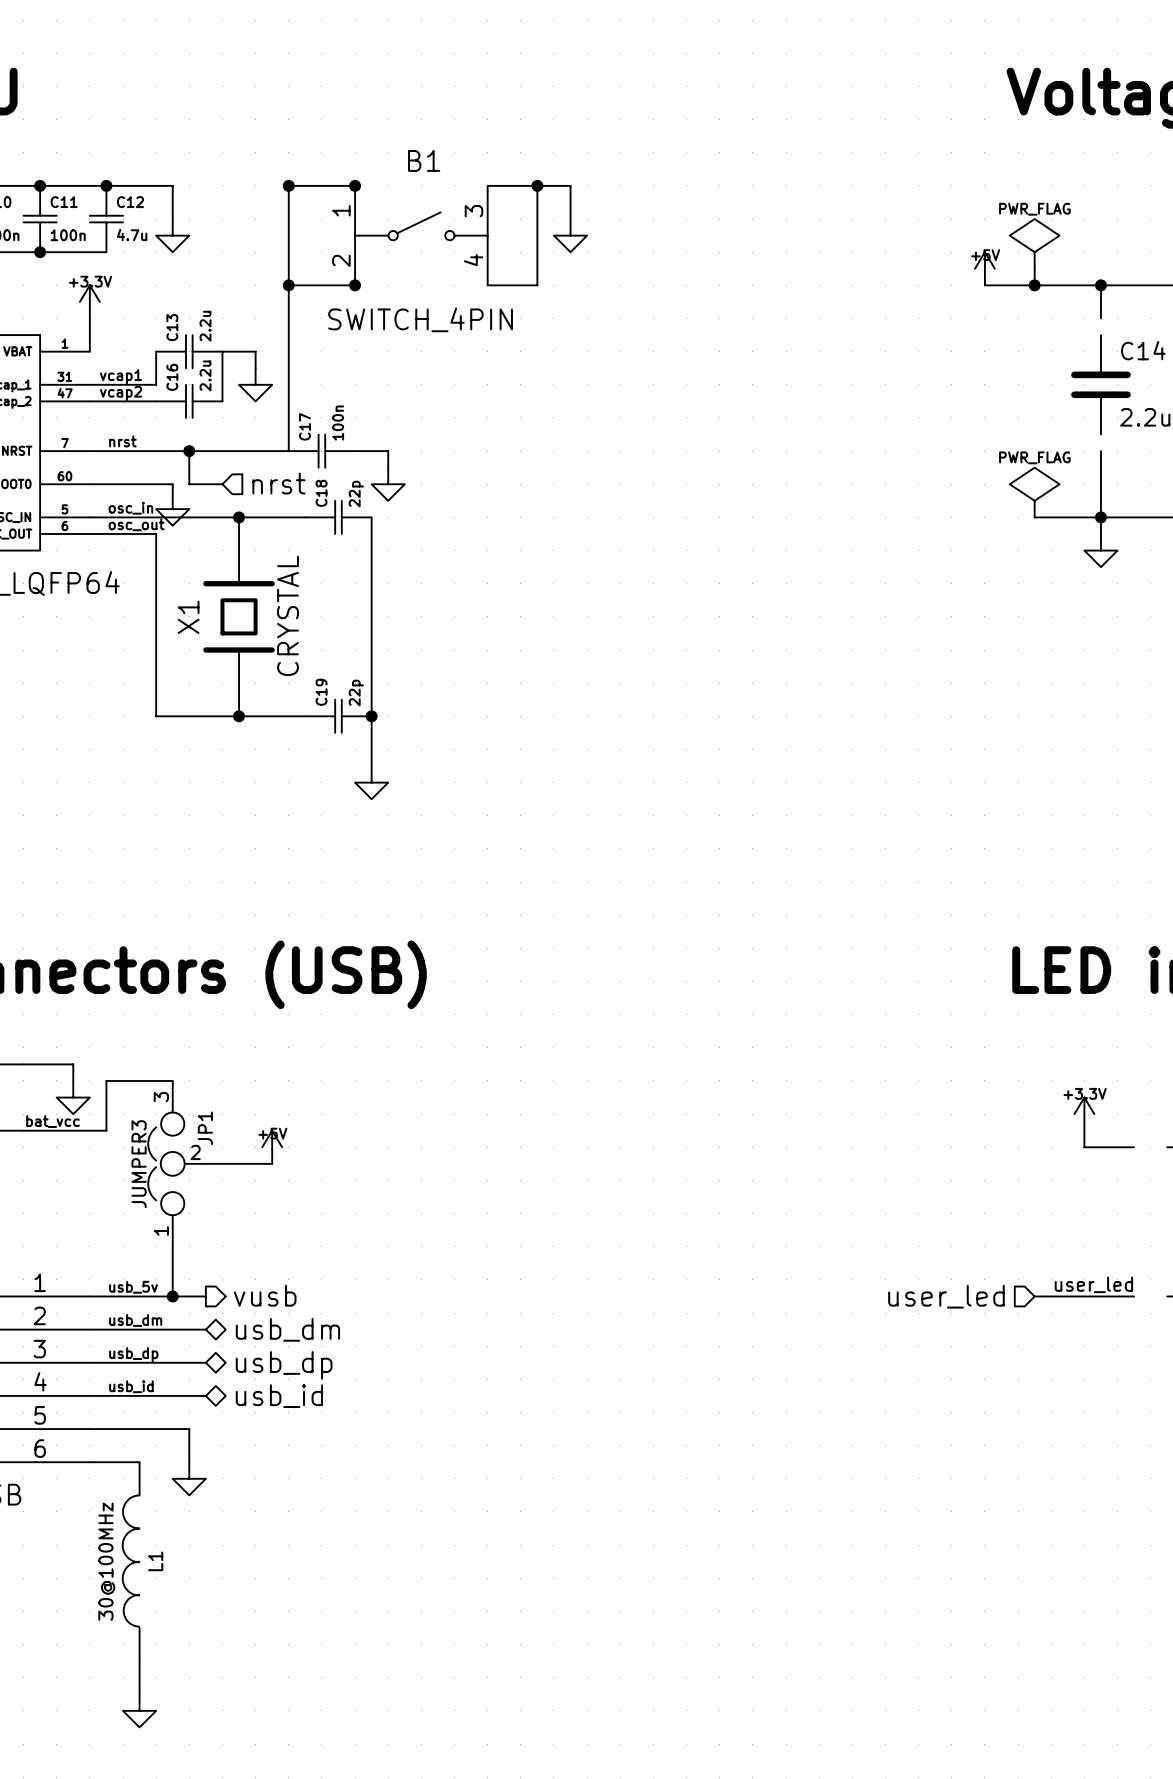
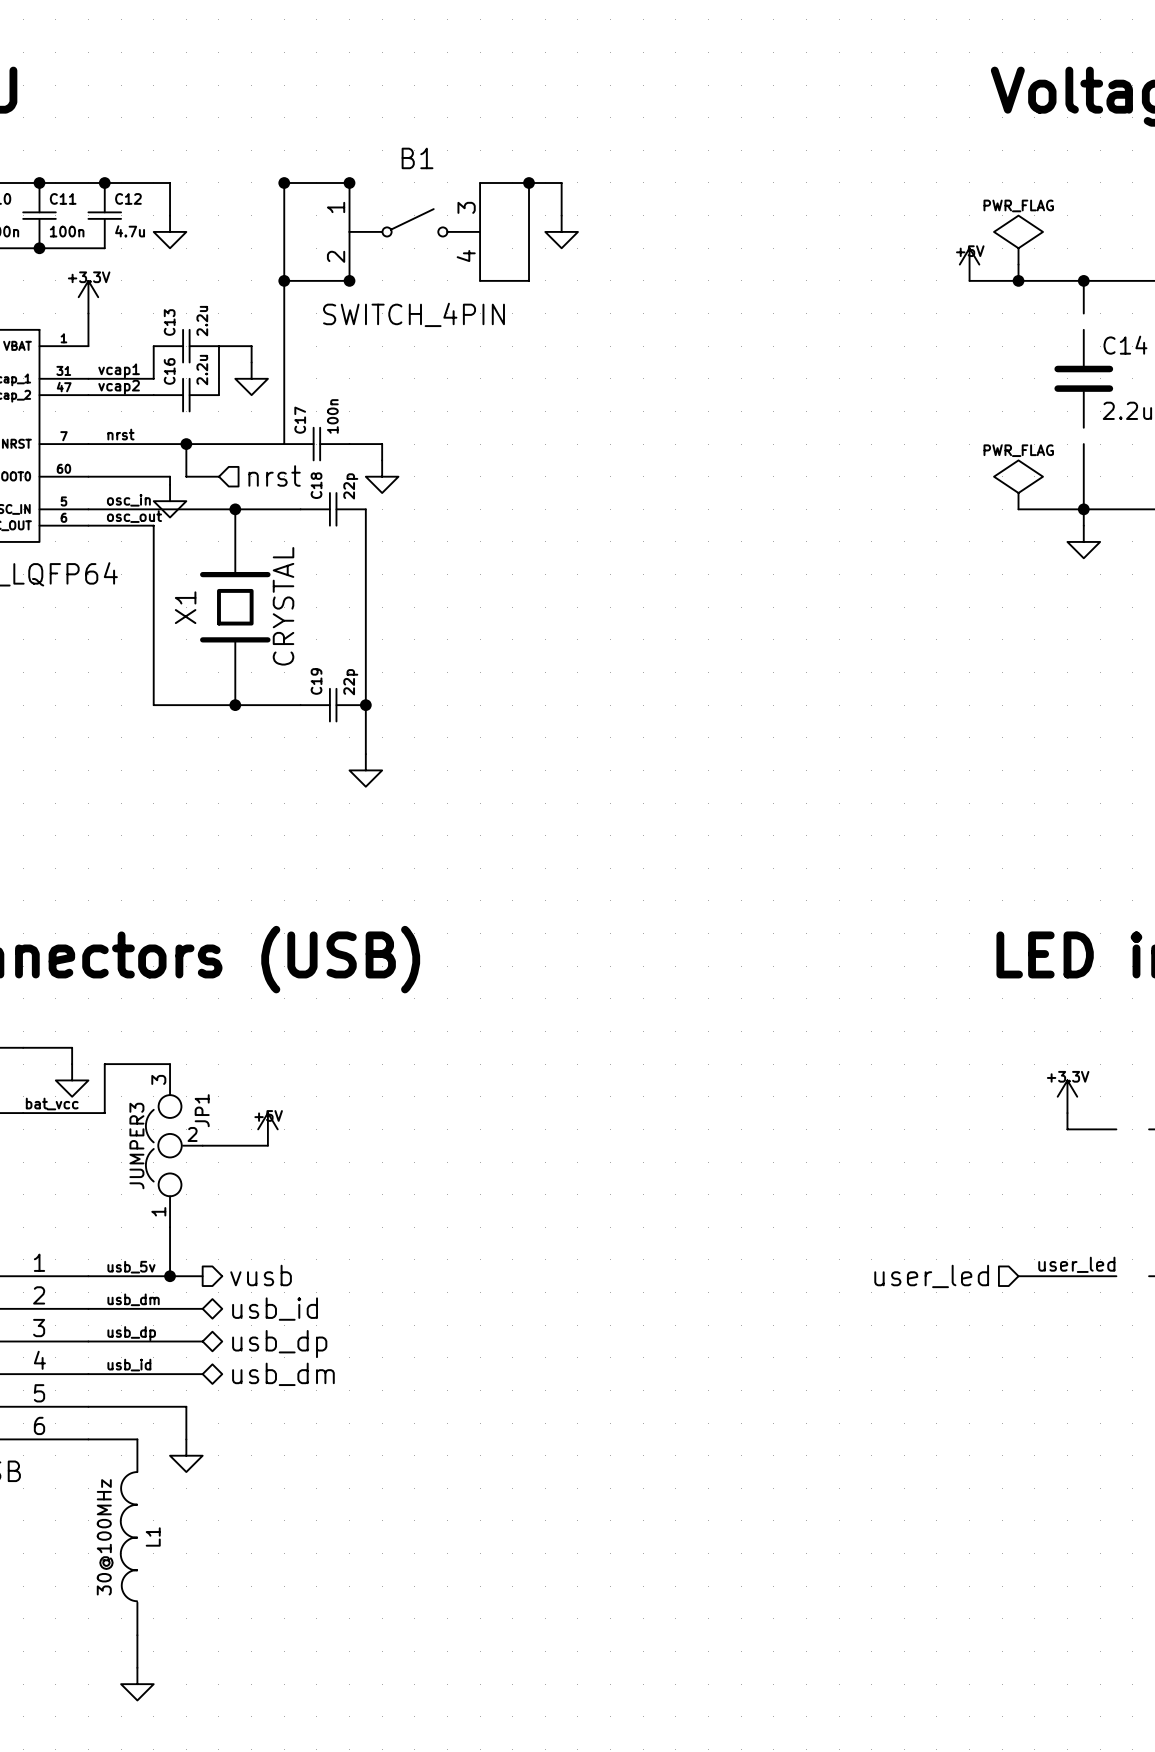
hierarchical label: usb_dm (287, 1329) -> usb_id (275, 1309)
hierarchical label: usb_id (279, 1396) -> usb_dm (283, 1374)

